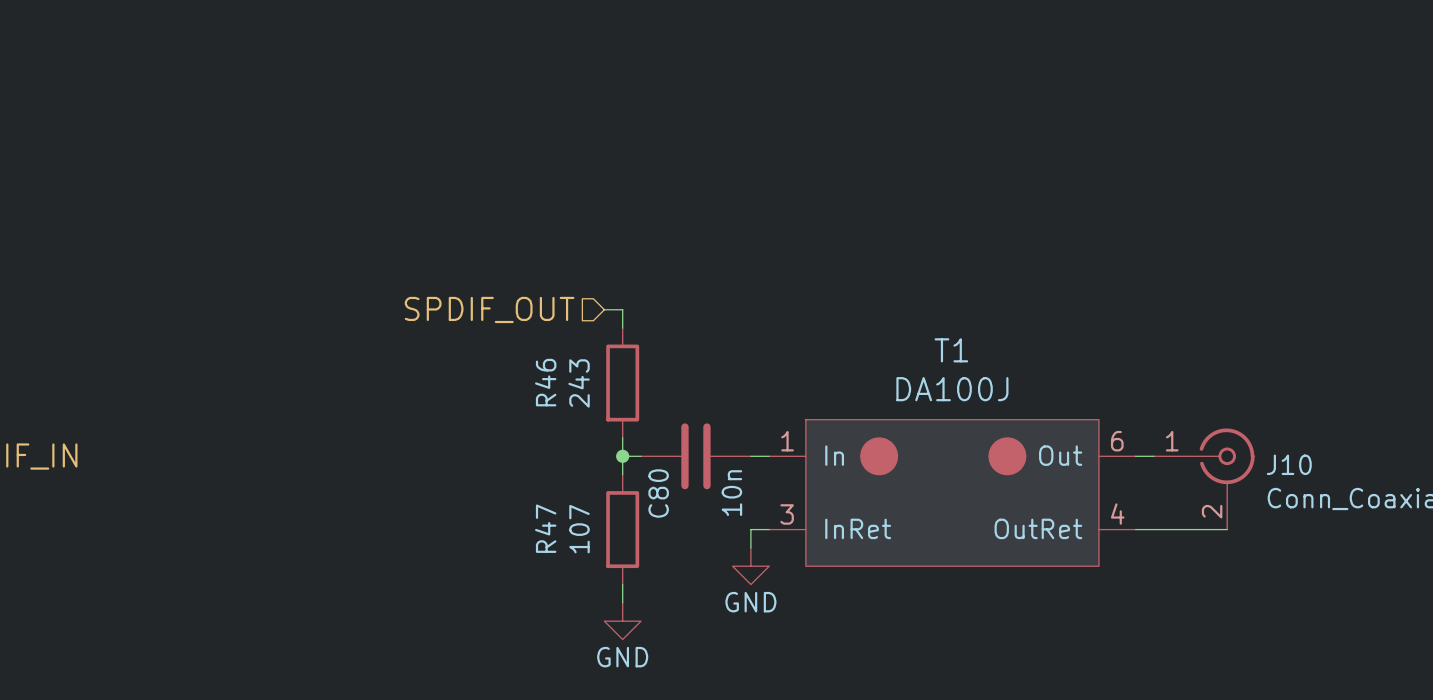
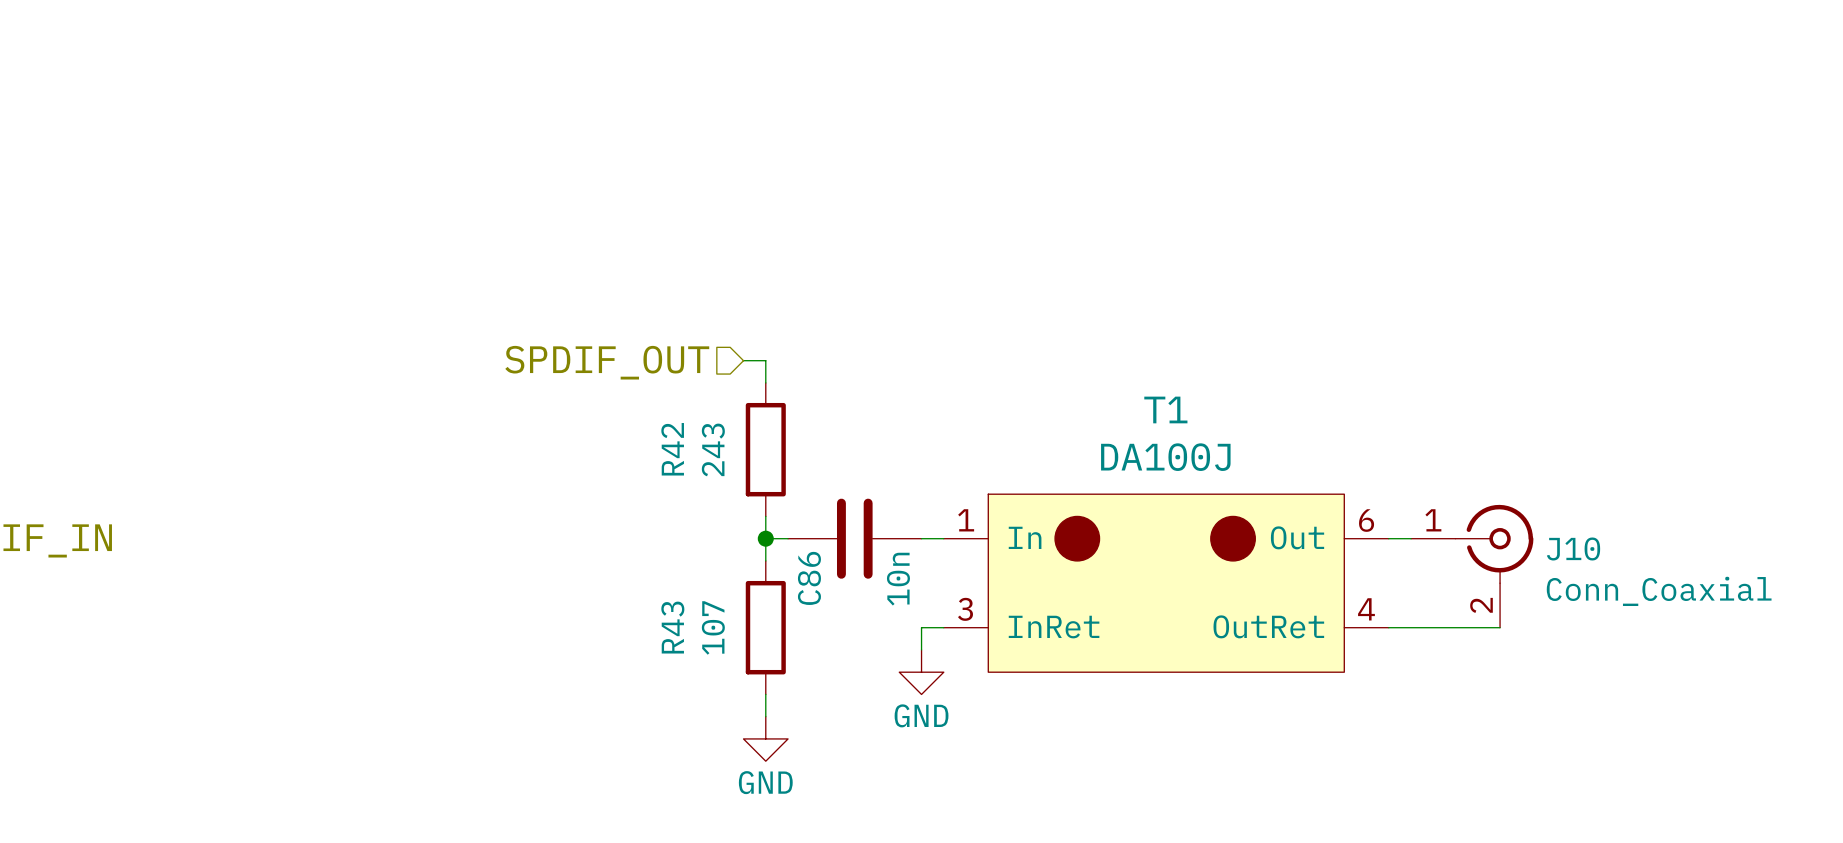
R46 name: R46 (545, 382) -> R42 (672, 449)
C80 name: C80 (658, 493) -> C86 (809, 578)
R47 name: R47 (545, 528) -> R43 (672, 627)

